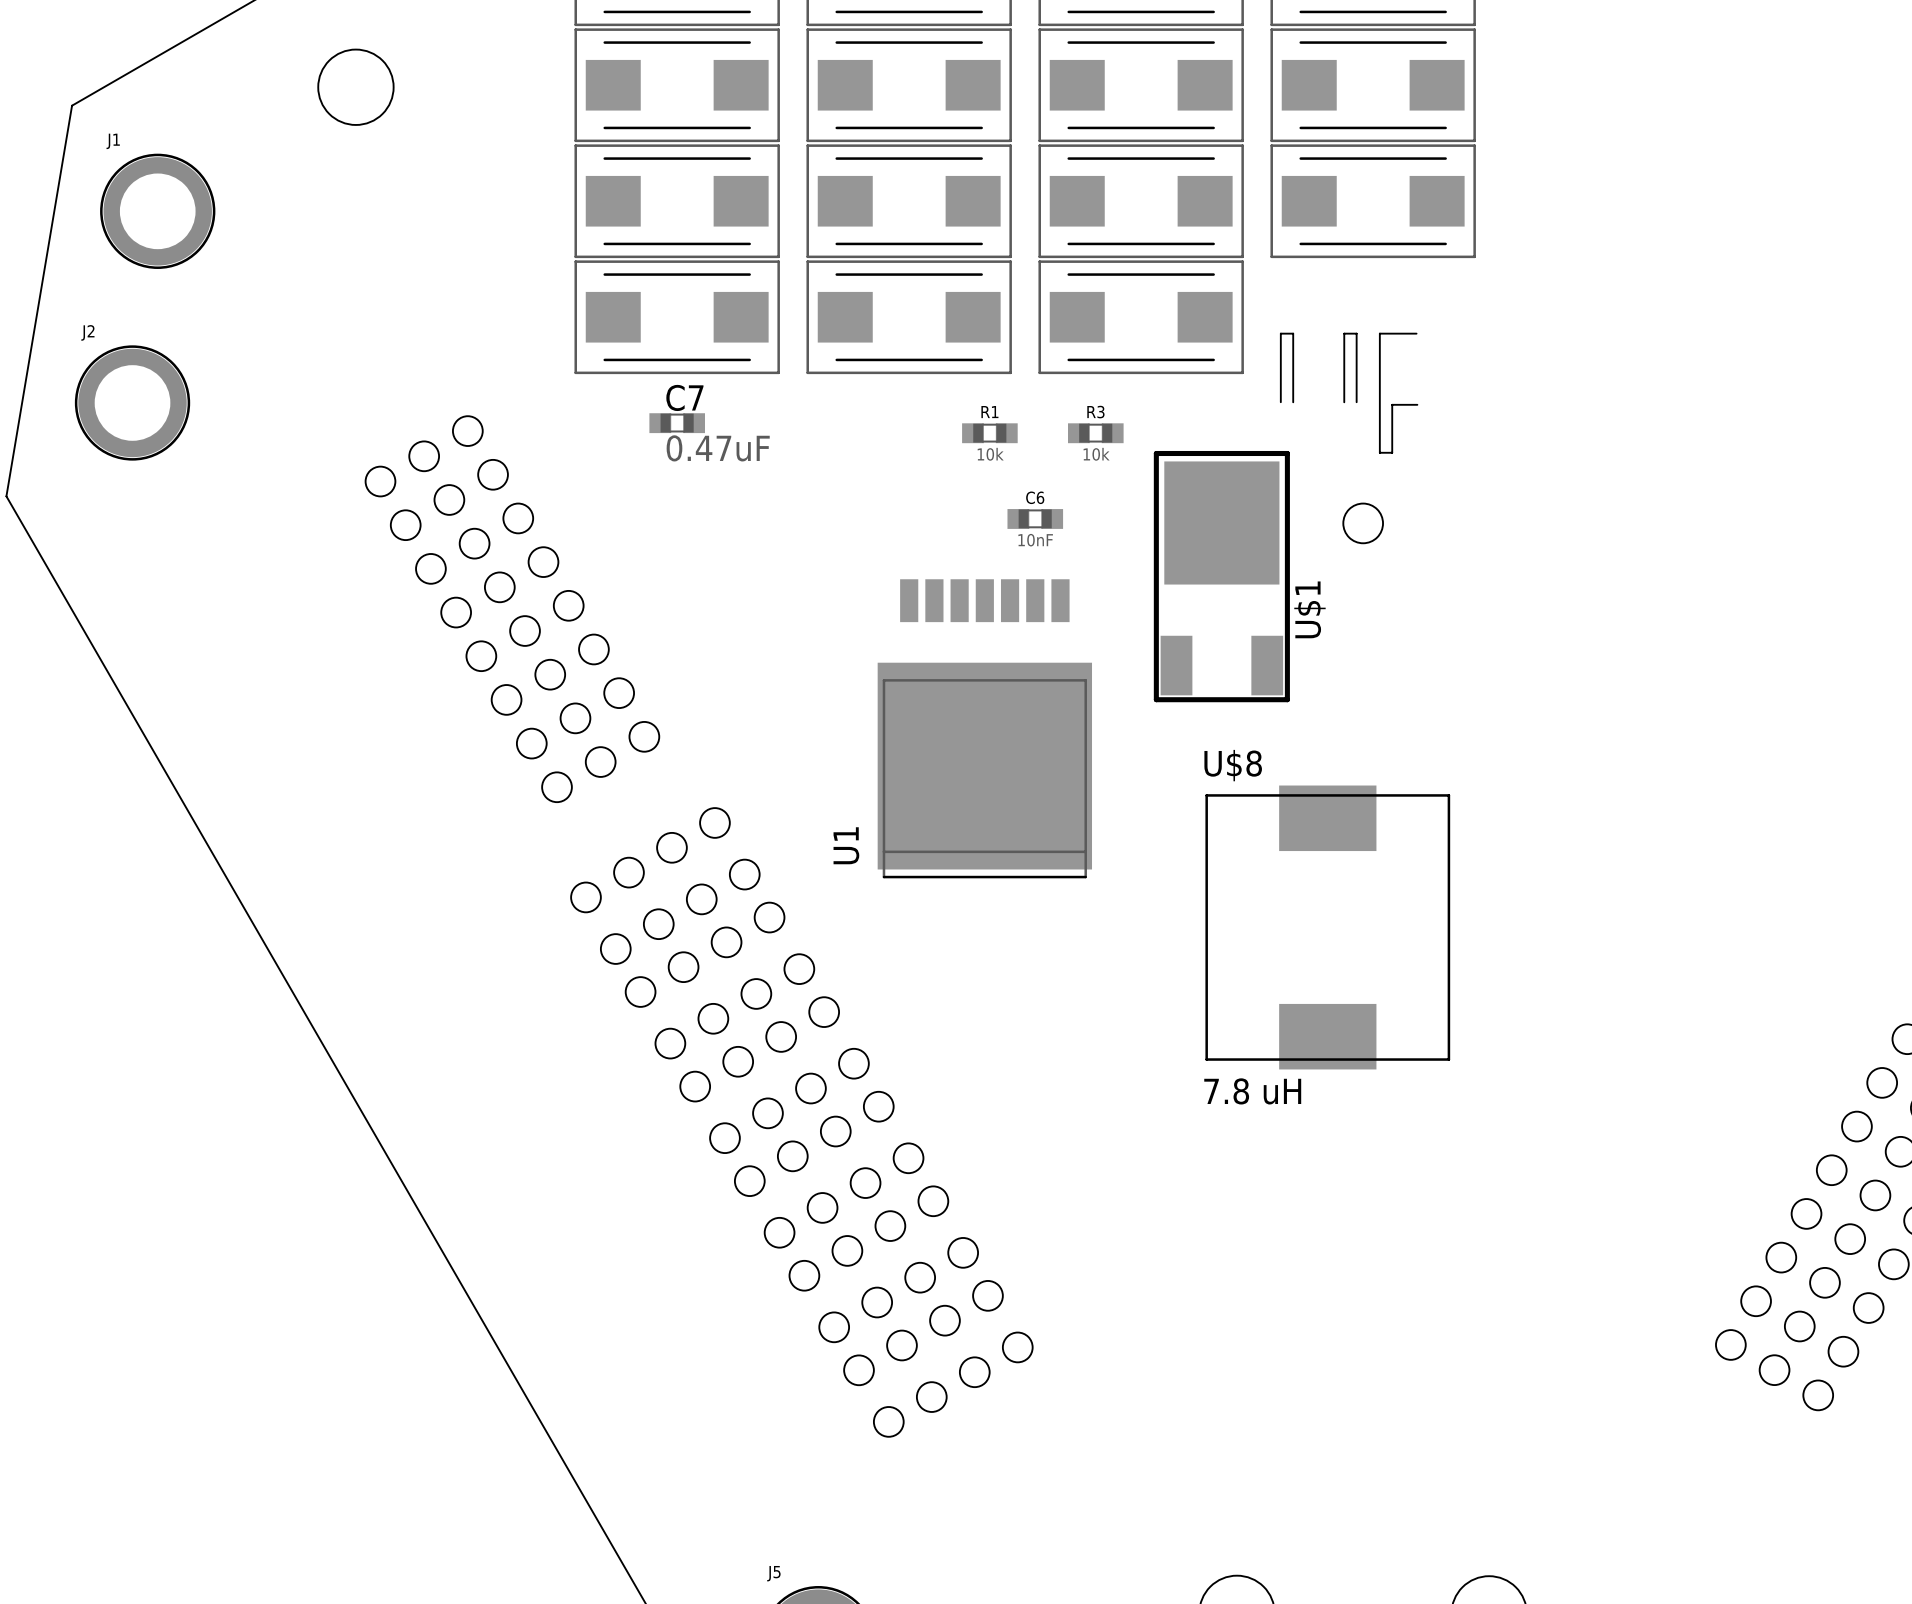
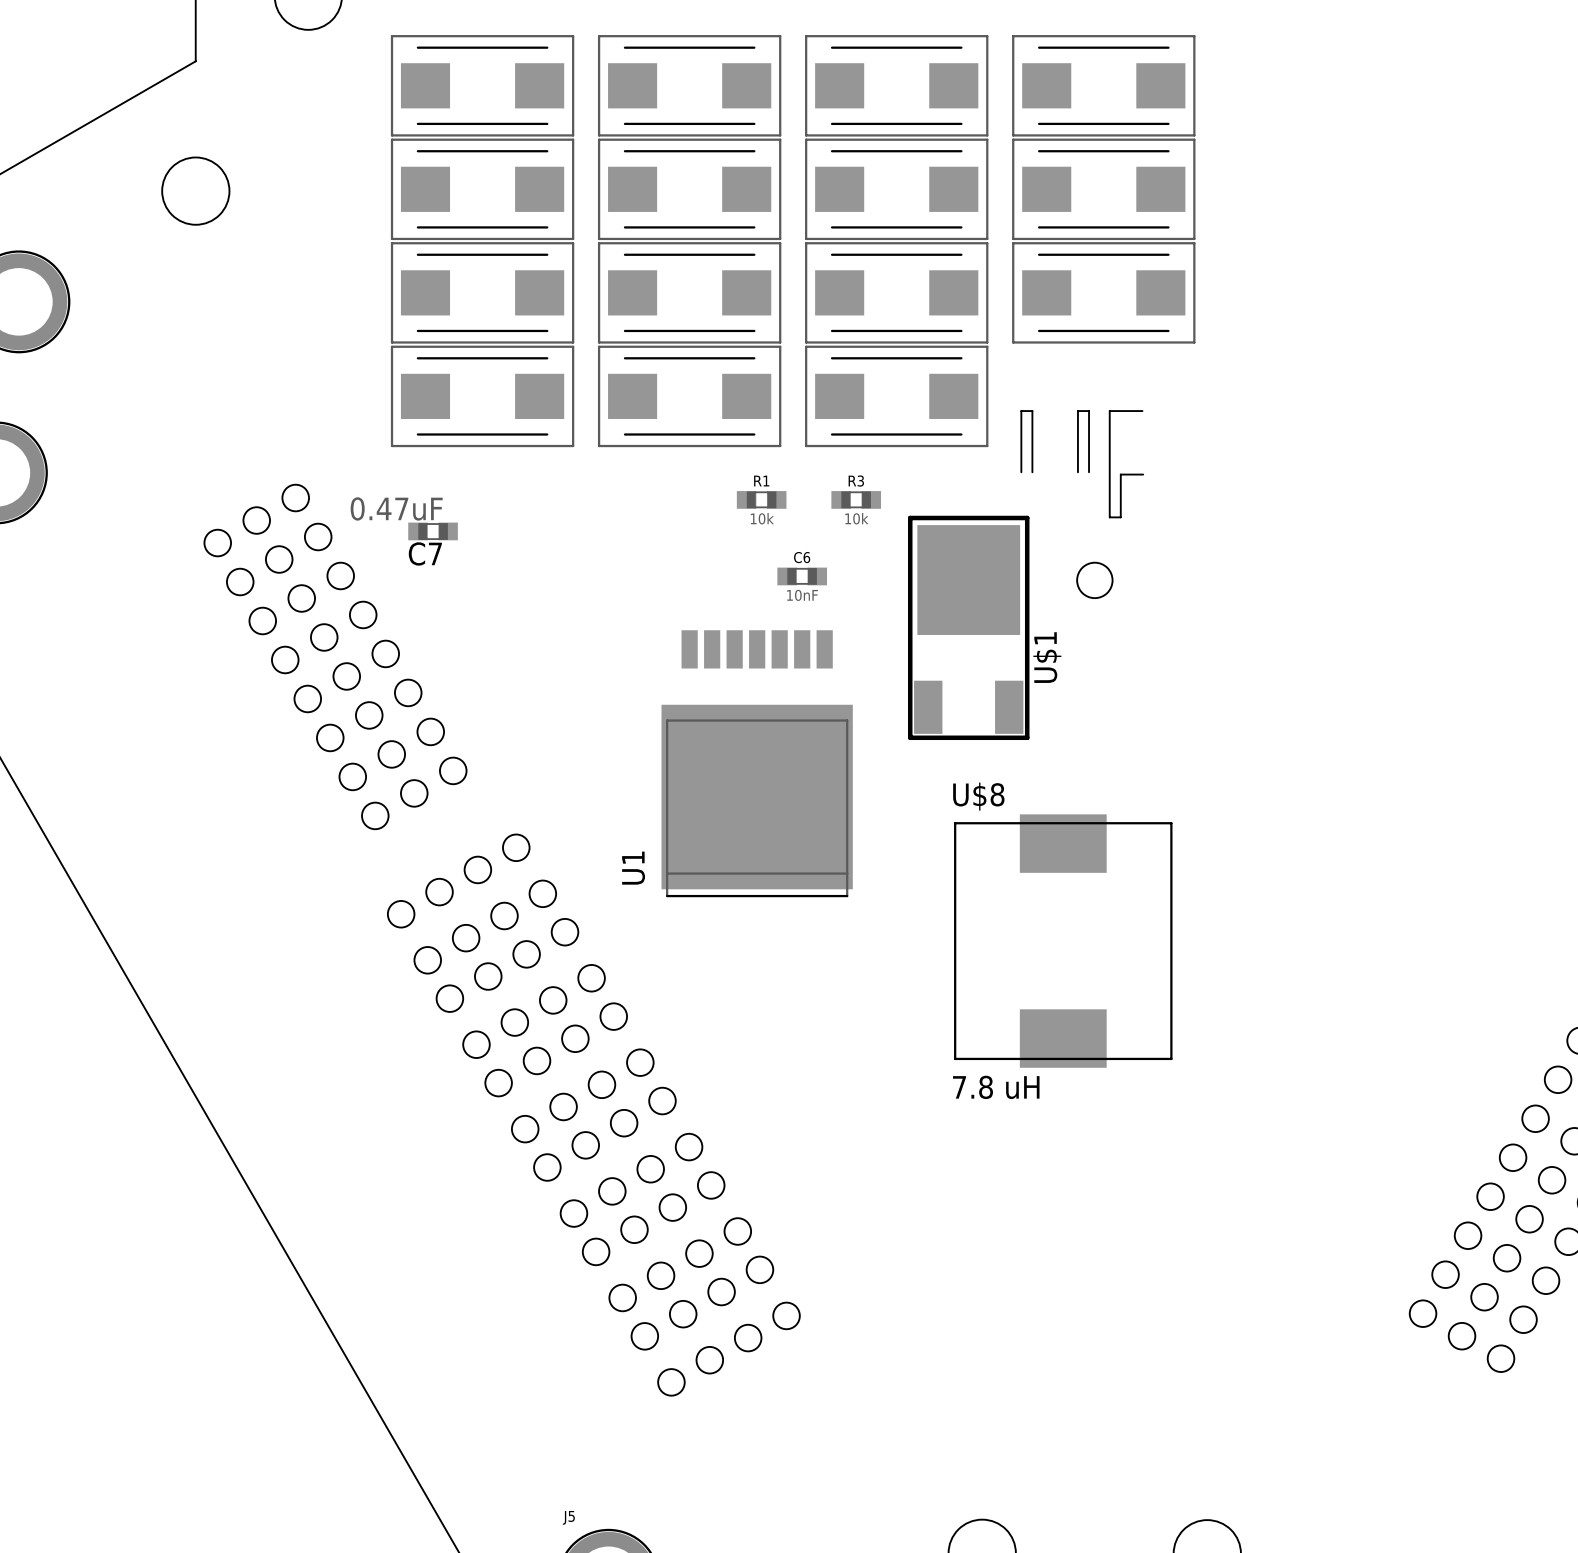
C7 name position: C7 (684, 397) -> C7 (425, 553)
C7 position: (677, 423) -> (433, 531)
C7 value position: 0.47uF (718, 448) -> 0.47uF (396, 508)

